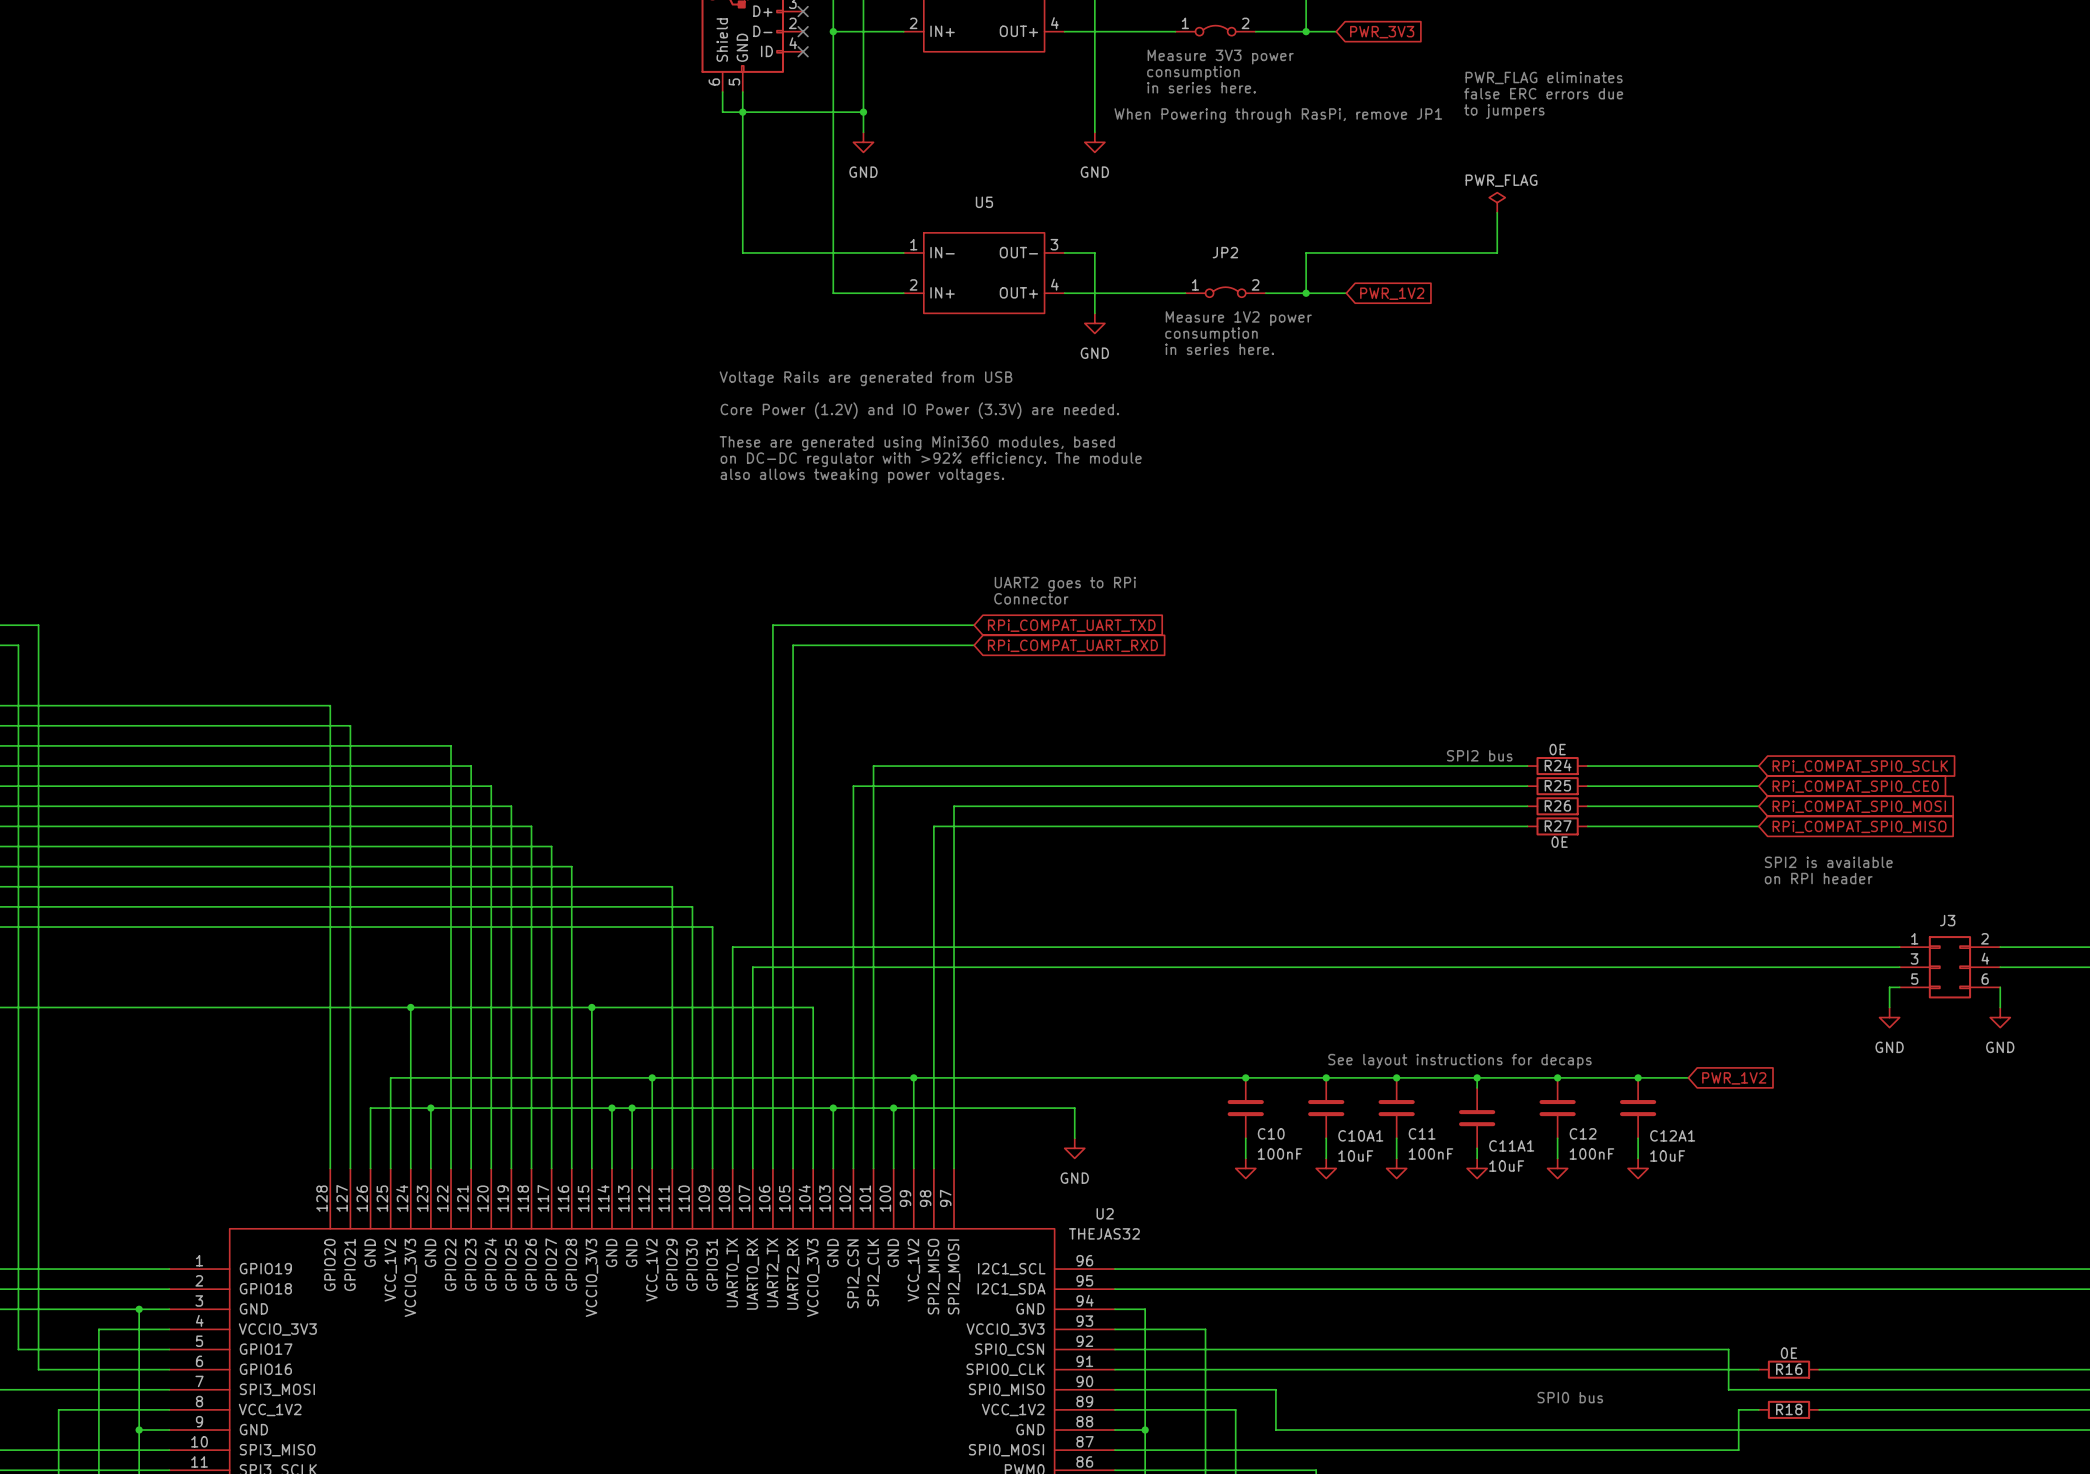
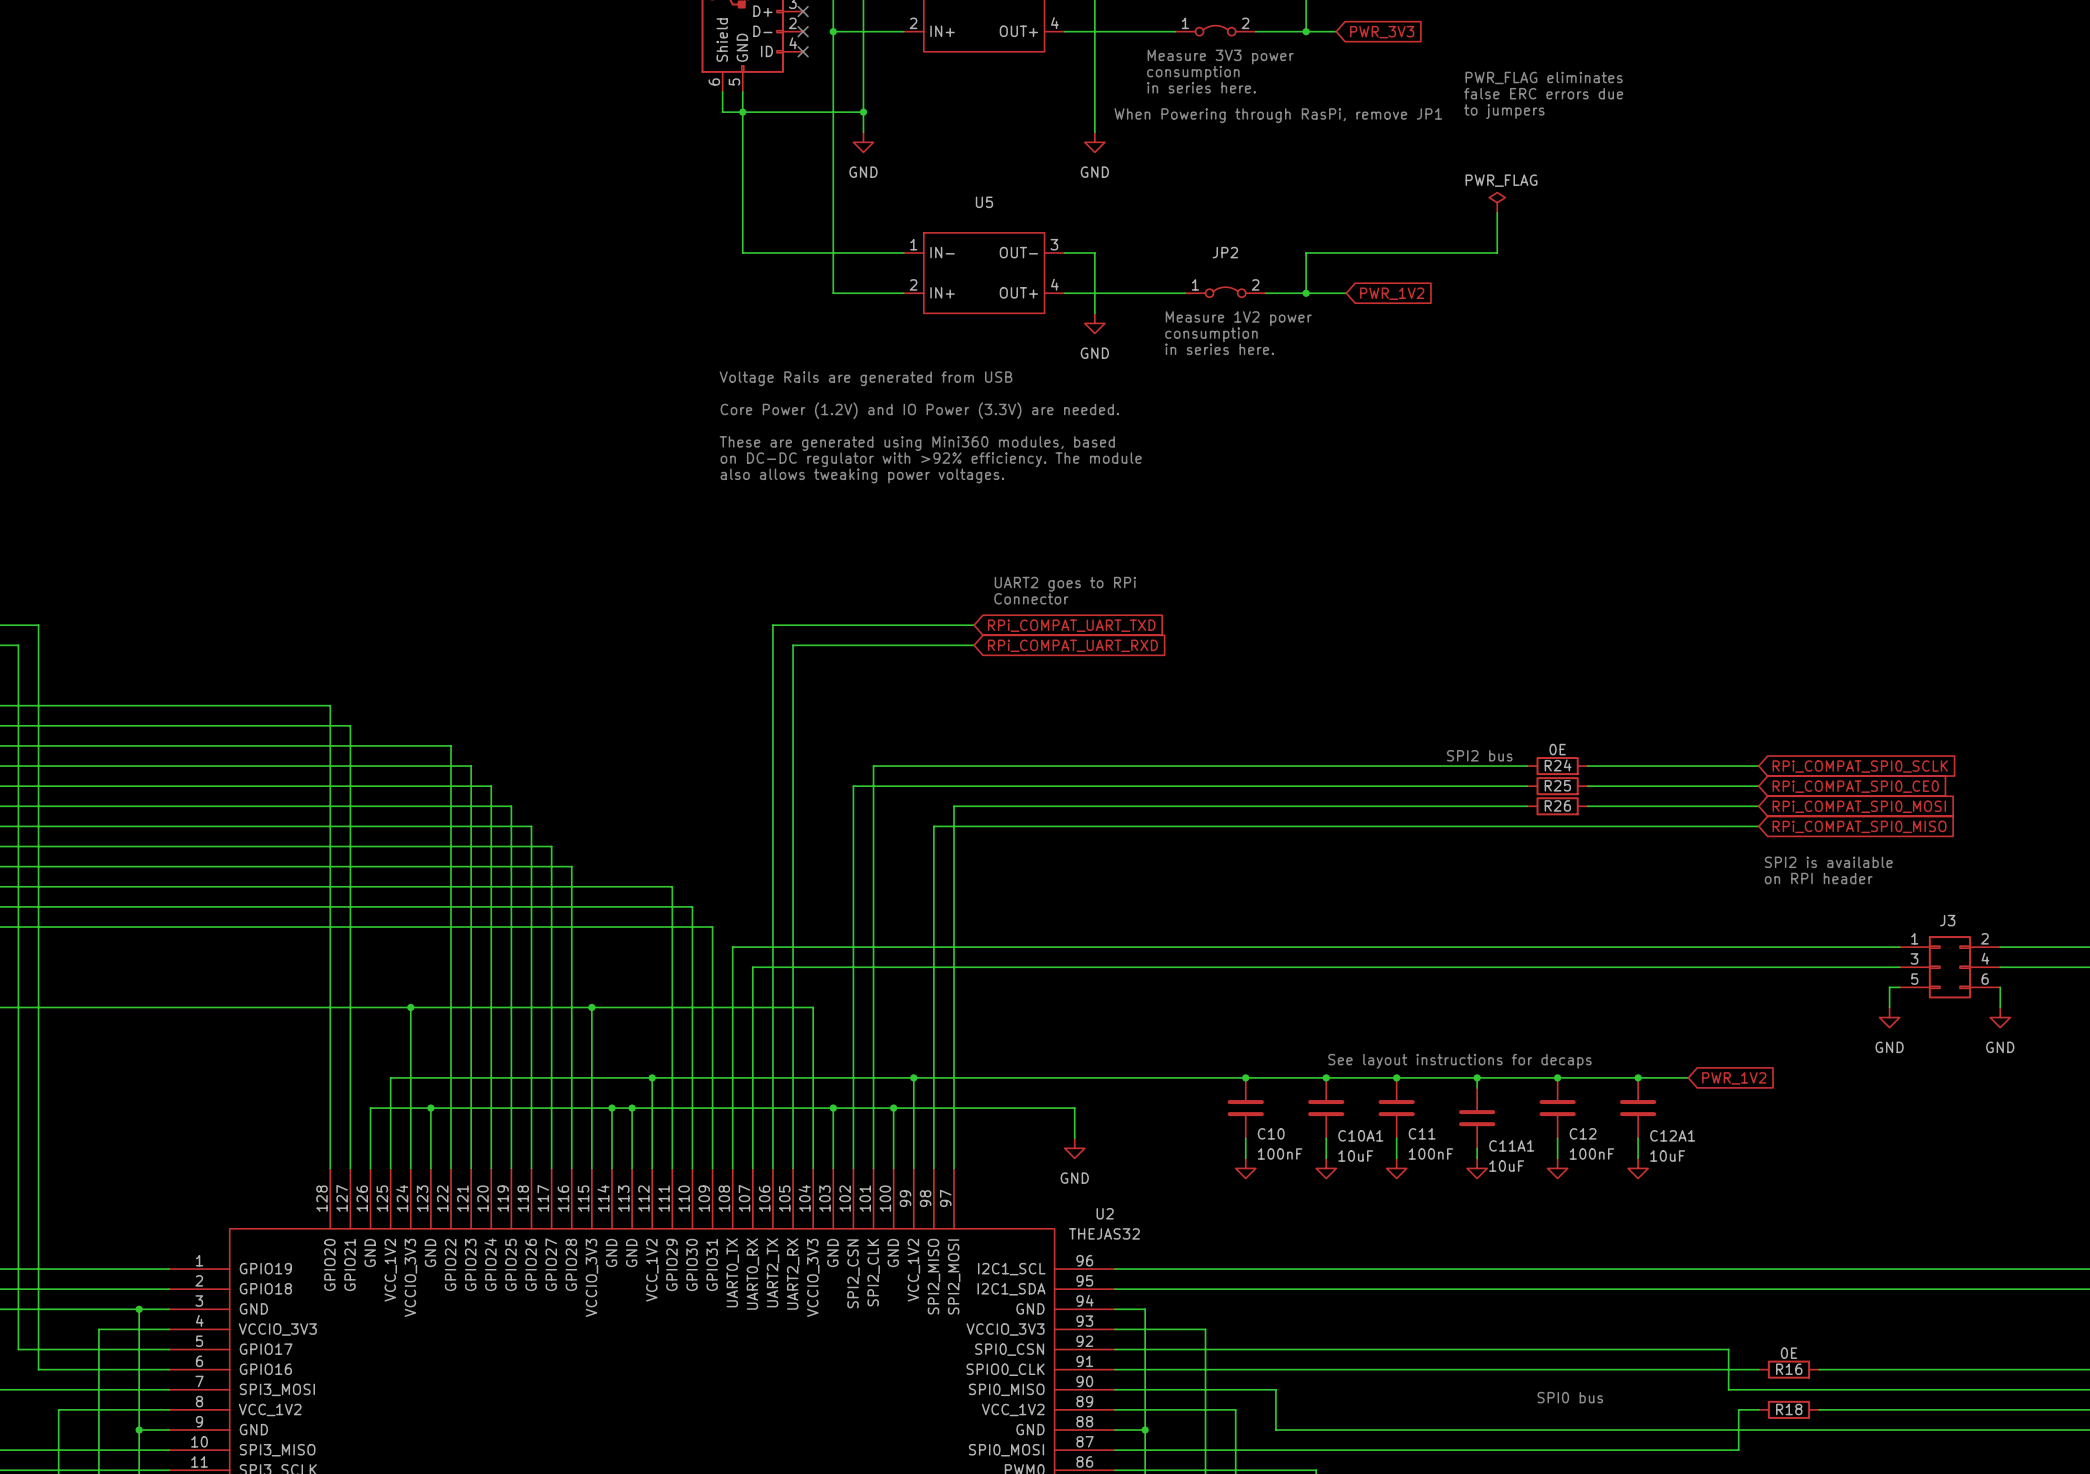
R27: 0E (1557, 826) -> none

